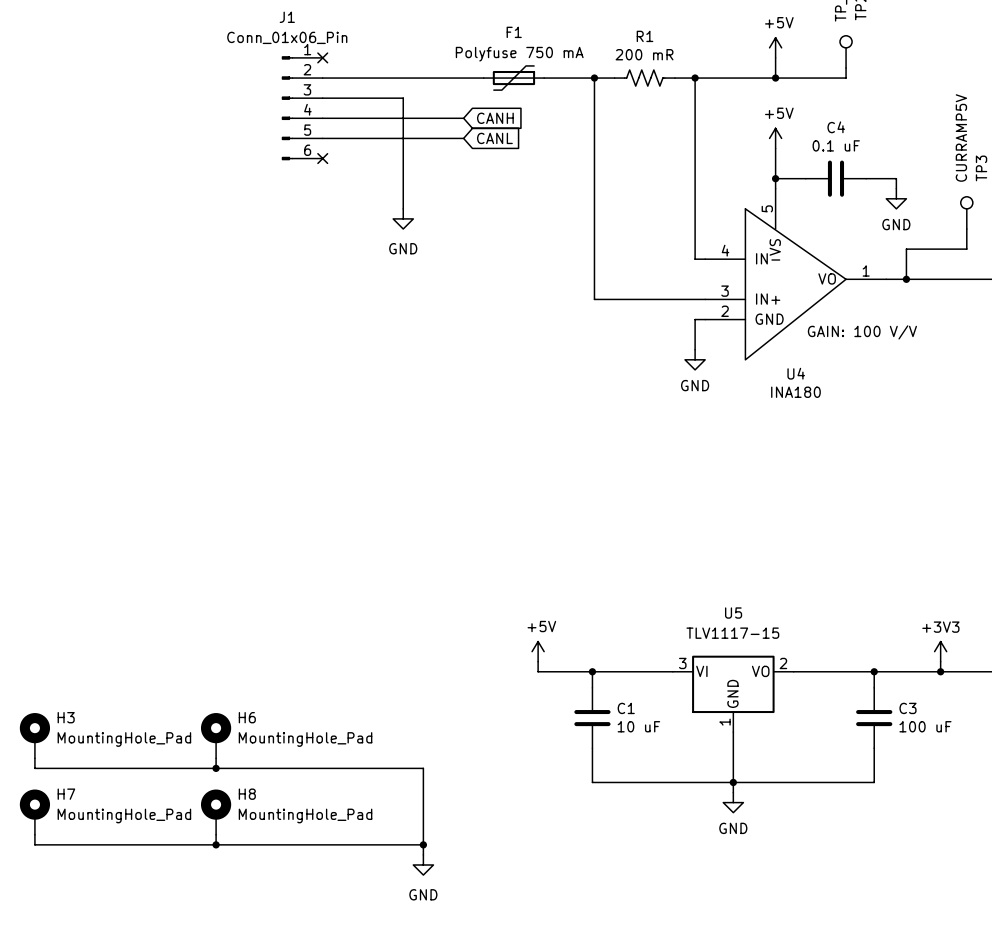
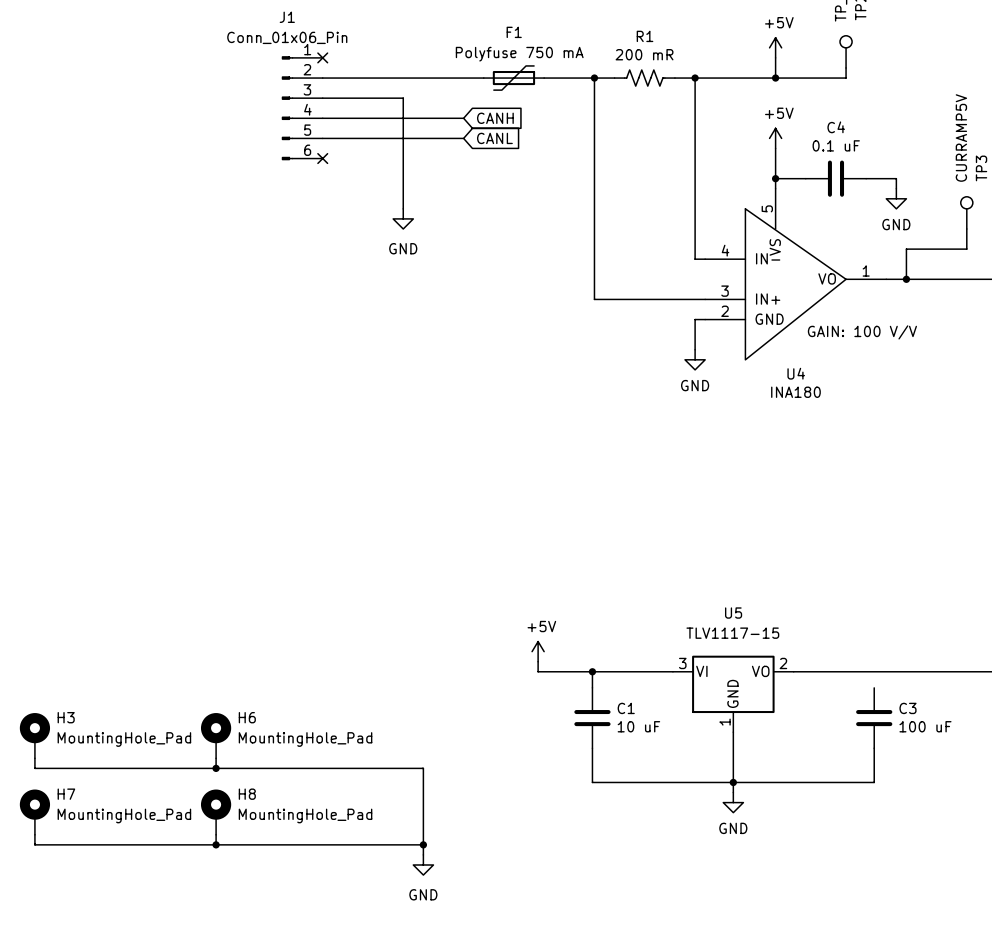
power symbol: +3V3 (940, 651) -> none
wire: (940, 661) (940, 671) -> none
wire: (874, 671) (874, 687) -> none
junction: (874, 671) -> none
junction: (940, 671) -> none

